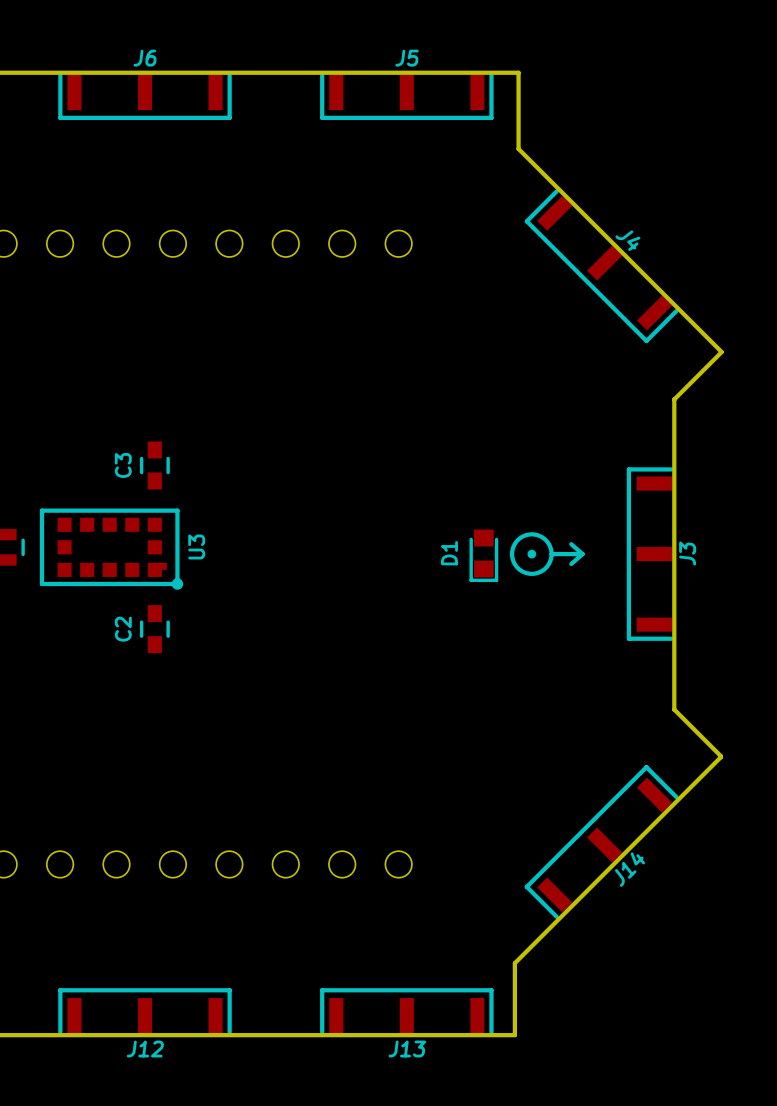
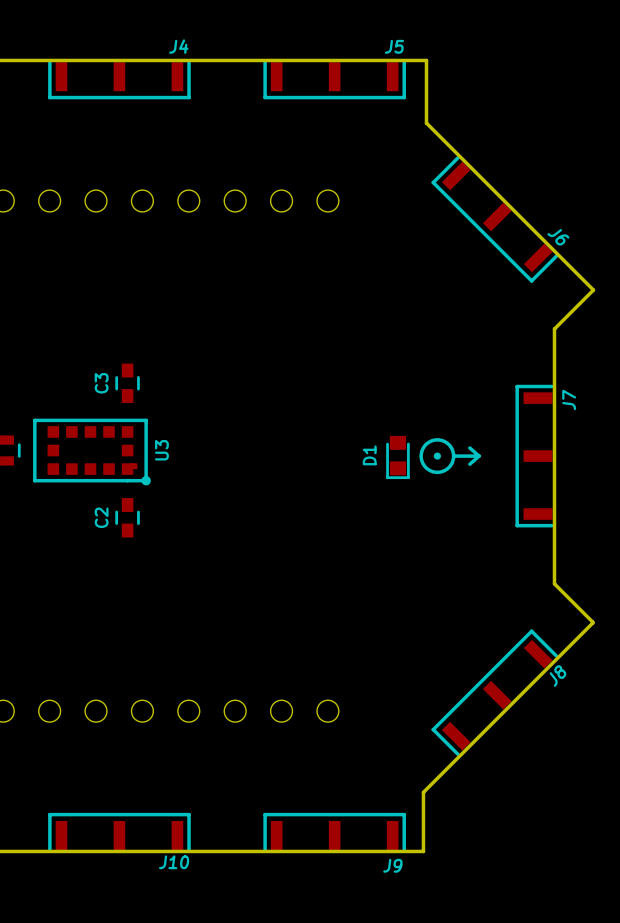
J6 name: J6 (145, 58) -> J4 (178, 46)
J5 name position: J5 (407, 58) -> J5 (394, 46)
J4 name: J4 (627, 240) -> J6 (558, 237)
J3 name: J3 (687, 553) -> J7 (569, 399)
J14 name: J14 (629, 869) -> J8 (557, 676)
J12 name: J12 (145, 1049) -> J10 (174, 862)
J13 name: J13 (407, 1049) -> J9 (392, 865)

